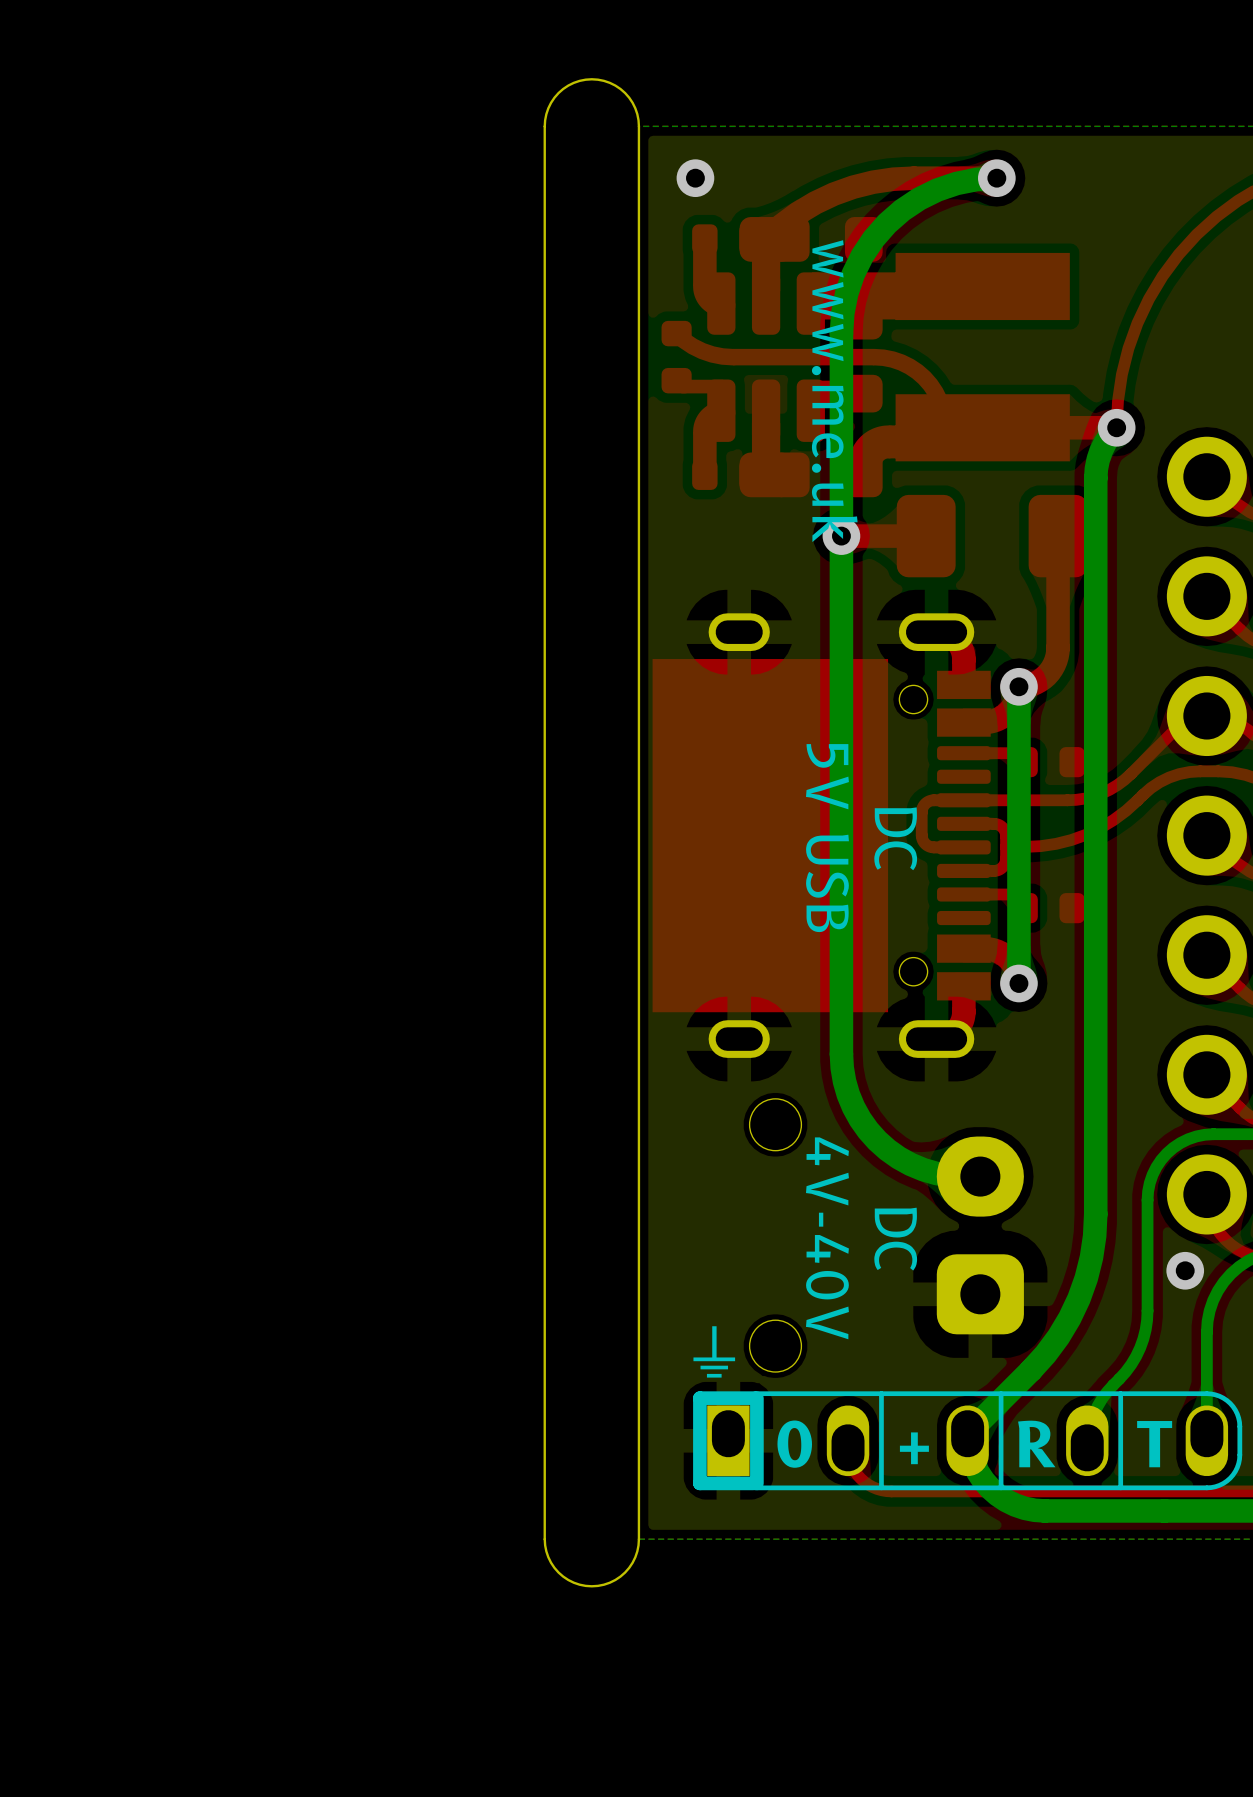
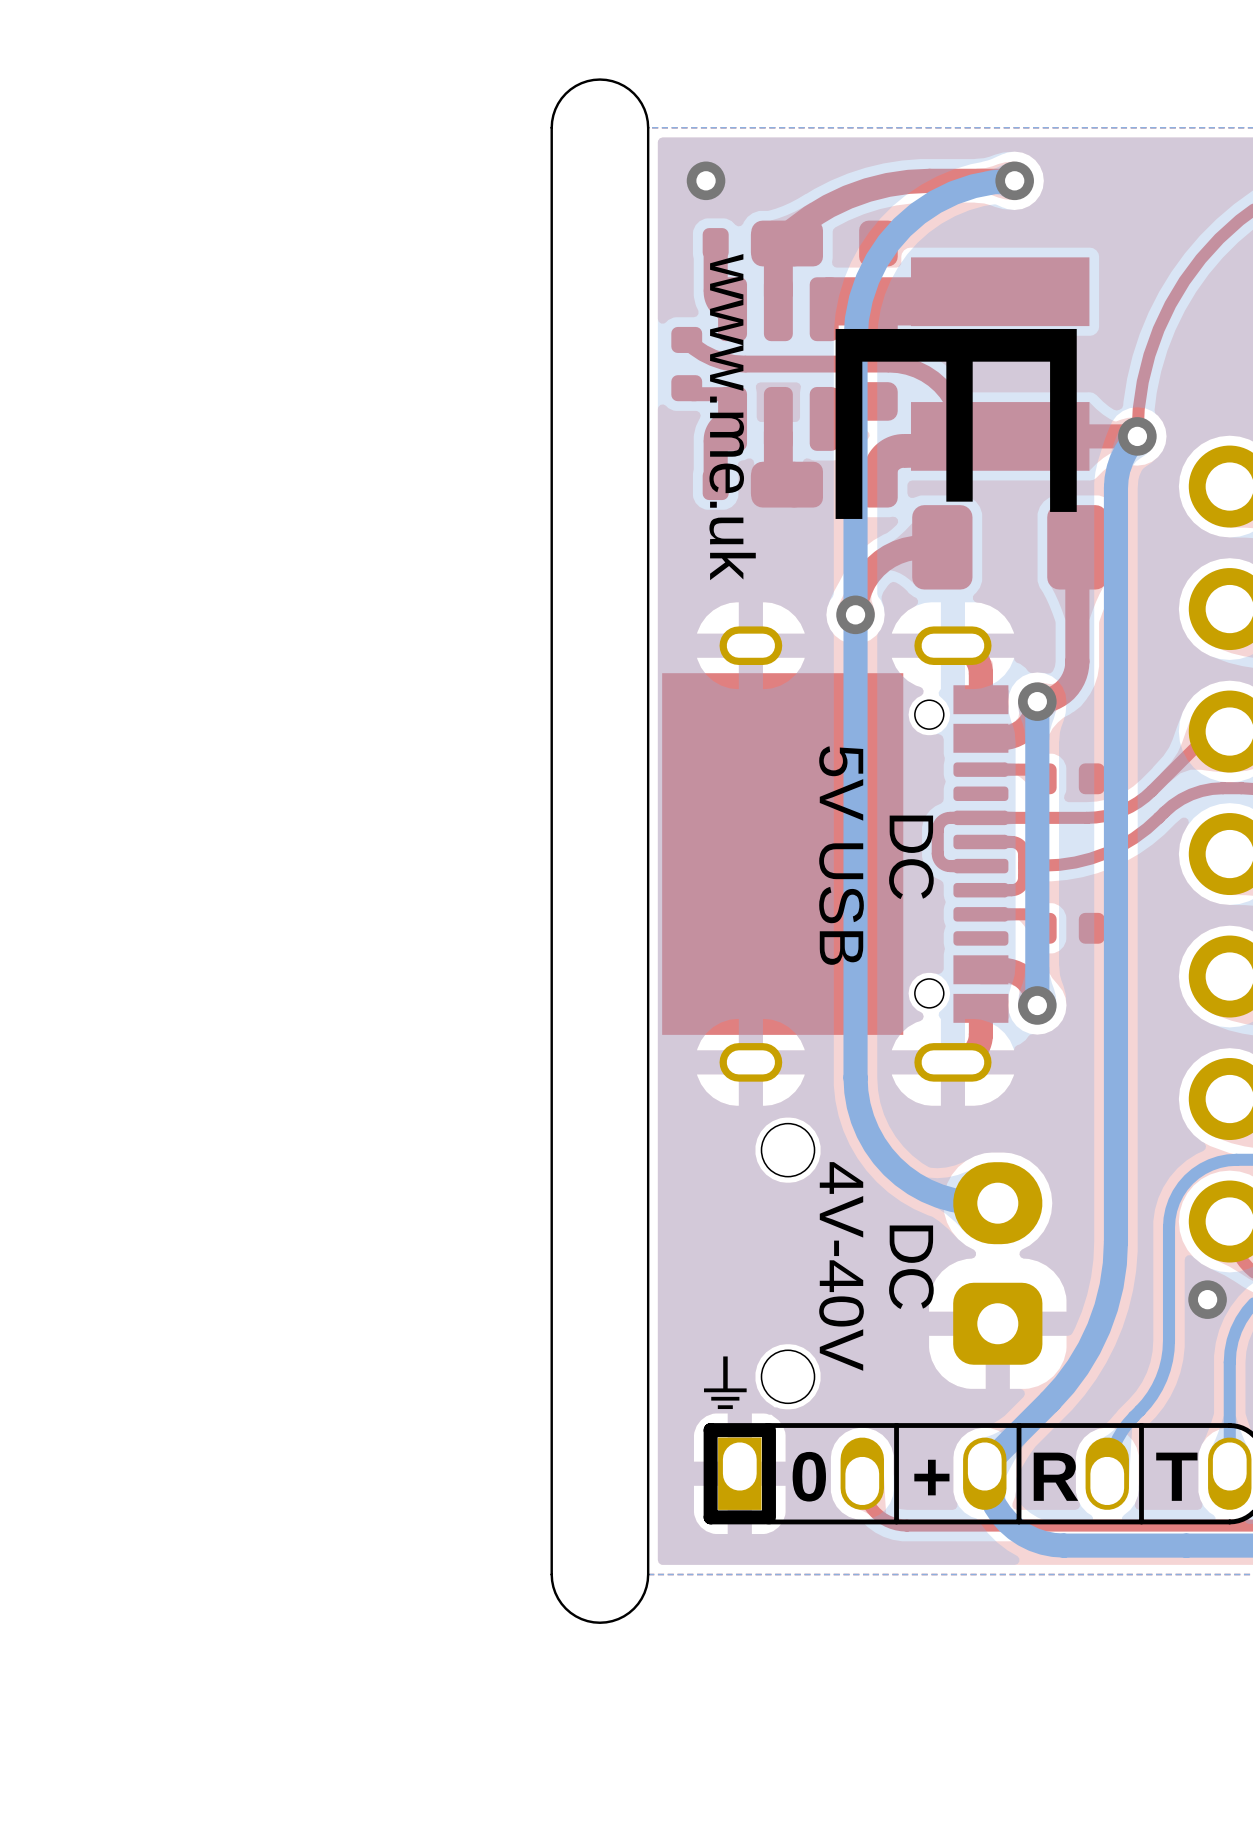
text position: www.me.uk (834, 391) -> www.me.uk (732, 417)
text: none -> E (956, 423)
via position: (841, 536) -> (855, 614)
top track: (907, 536) (841, 536) -> (923, 547) (897, 552) (875, 567) (860, 589) (855, 614)

